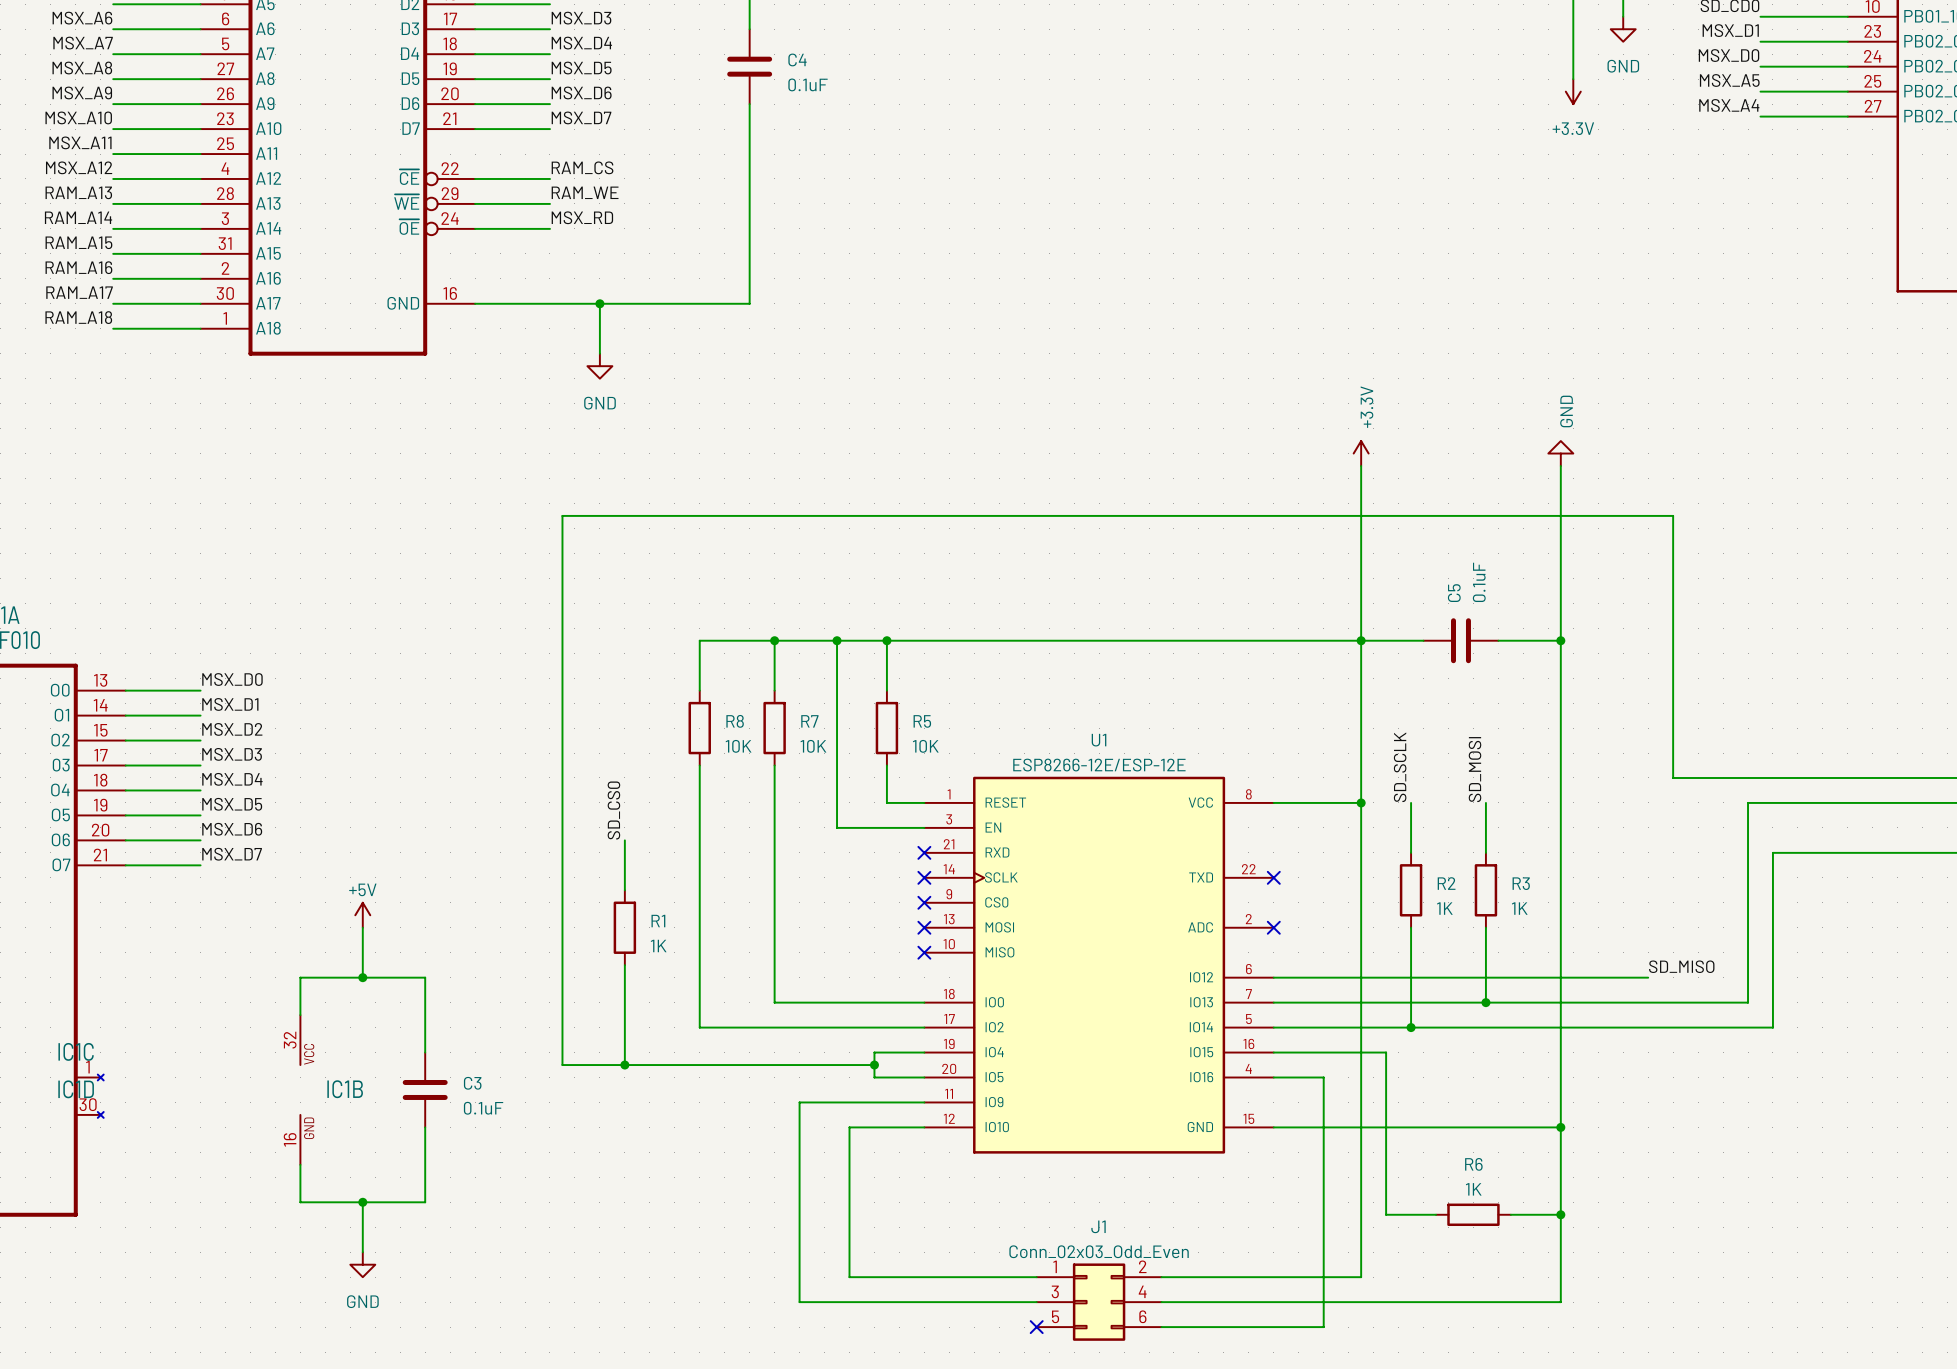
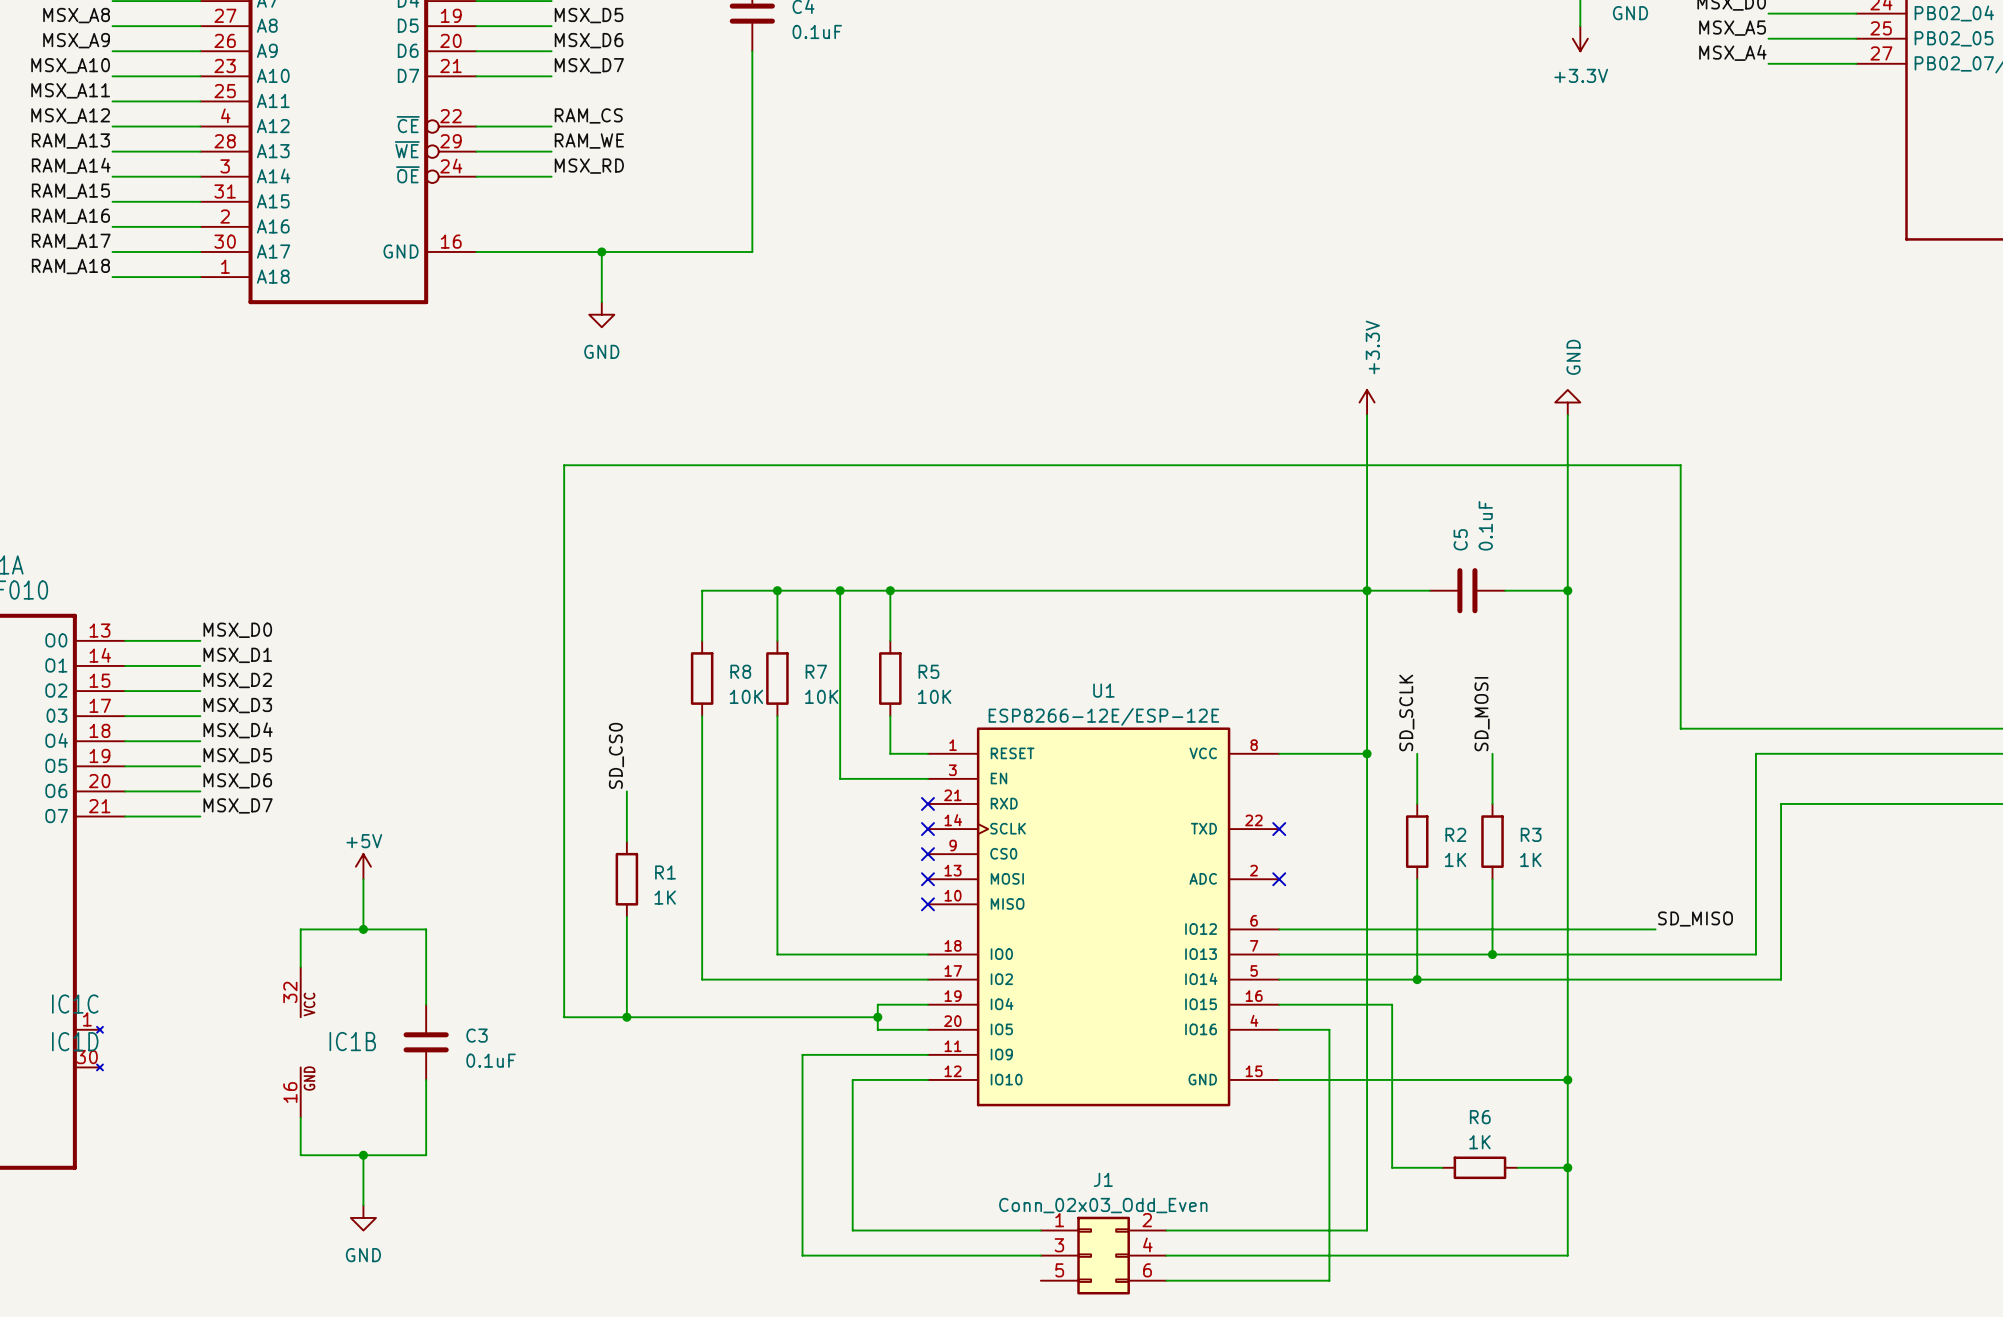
no-connect mark: (1036, 1327) -> none

